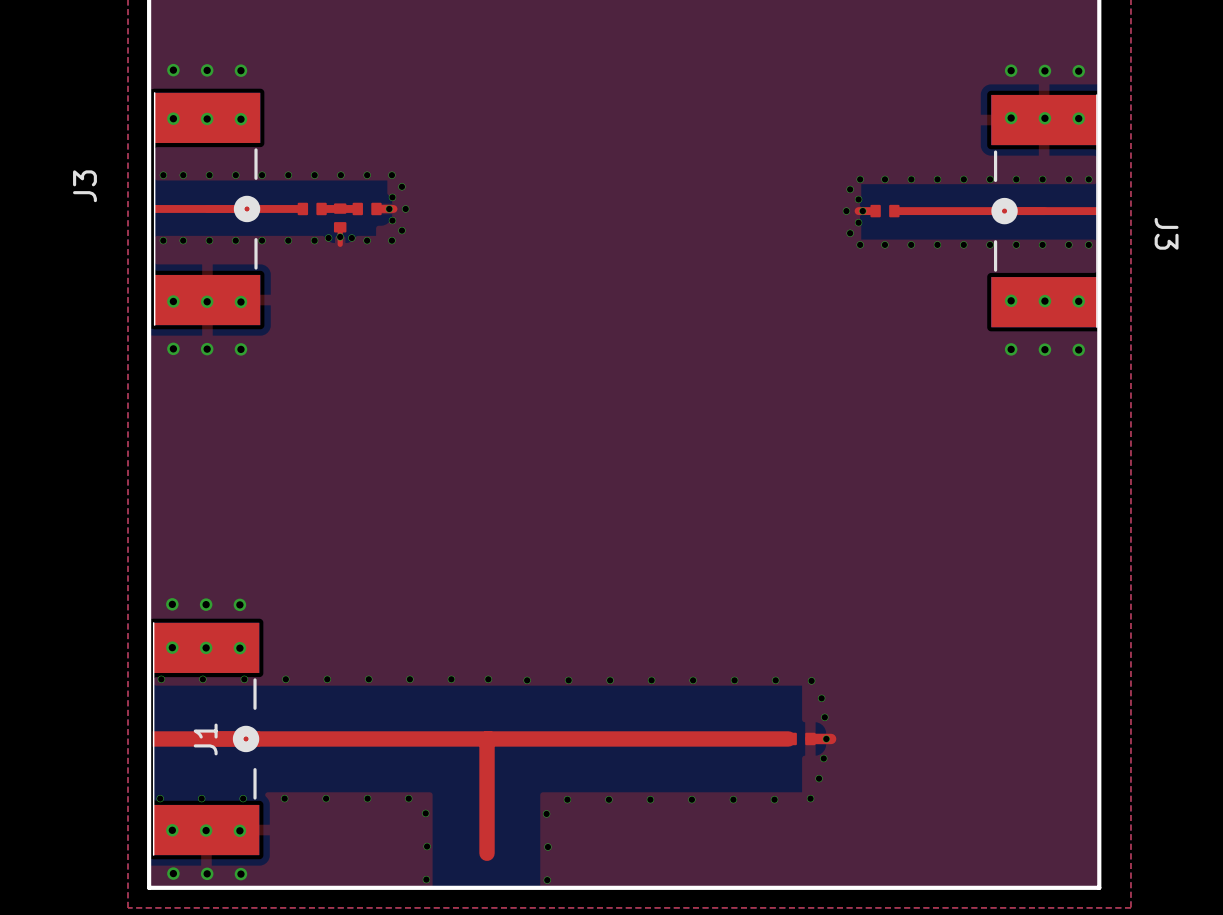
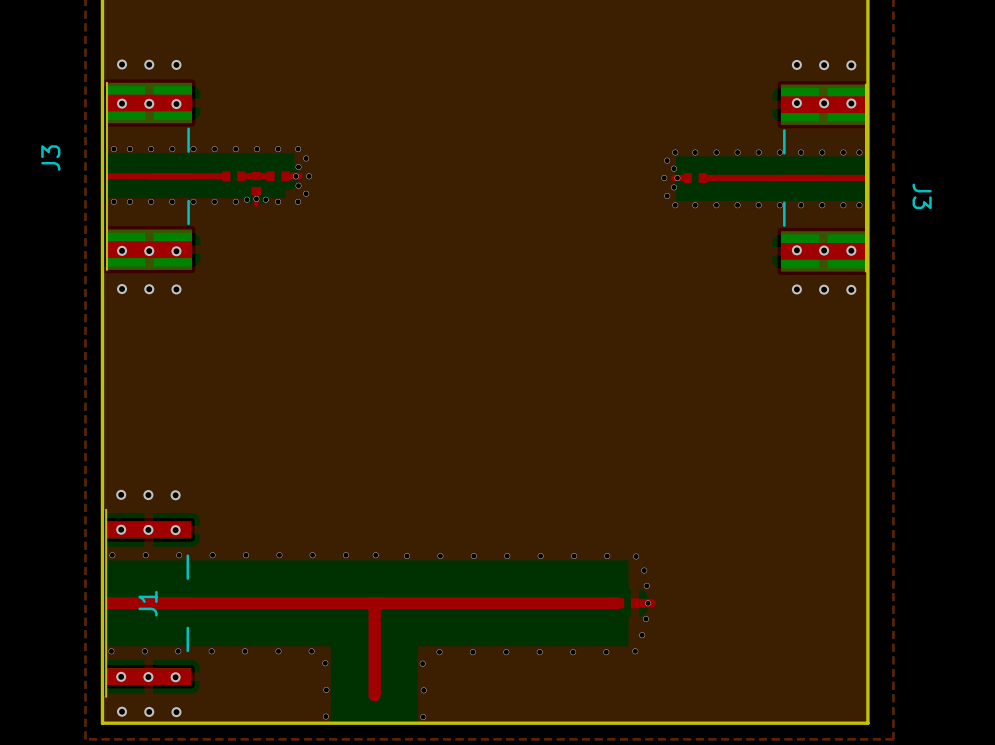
J3 footprint: [154, 92, 261, 326] -> [106, 82, 192, 271]
J3 footprint: [991, 94, 1098, 328] -> [780, 84, 867, 272]
J1 footprint: [152, 622, 261, 856] -> [105, 509, 192, 698]

